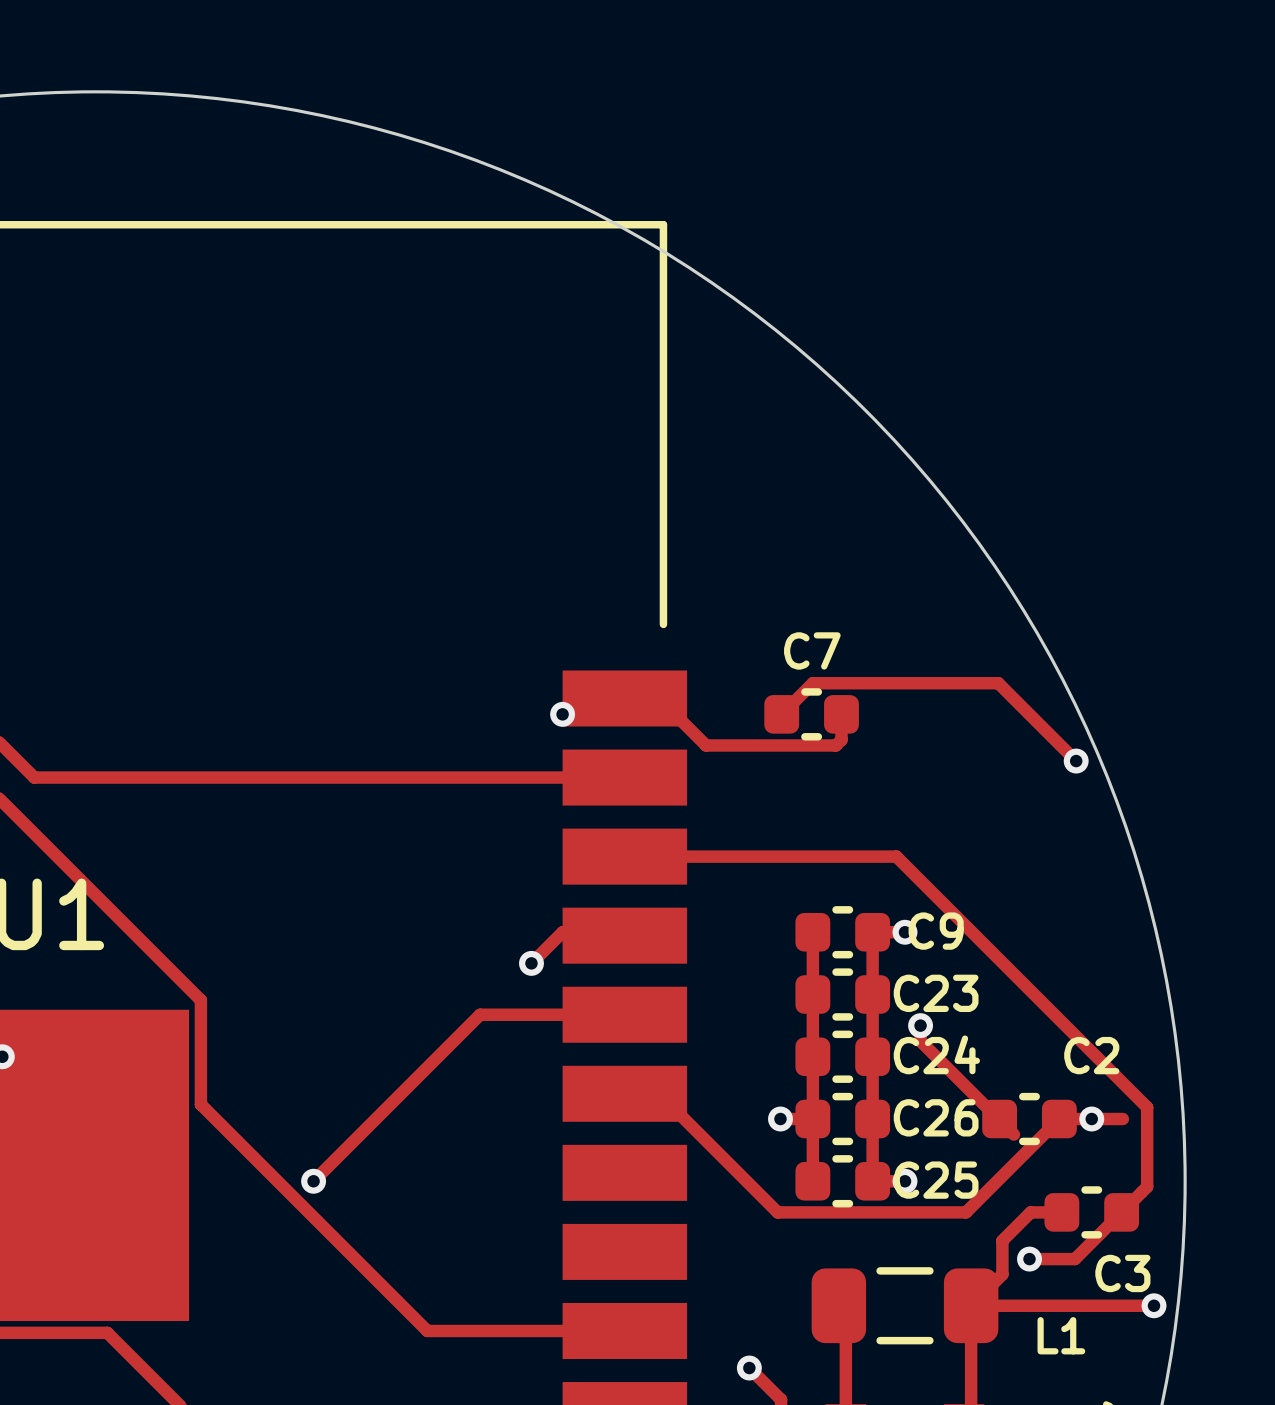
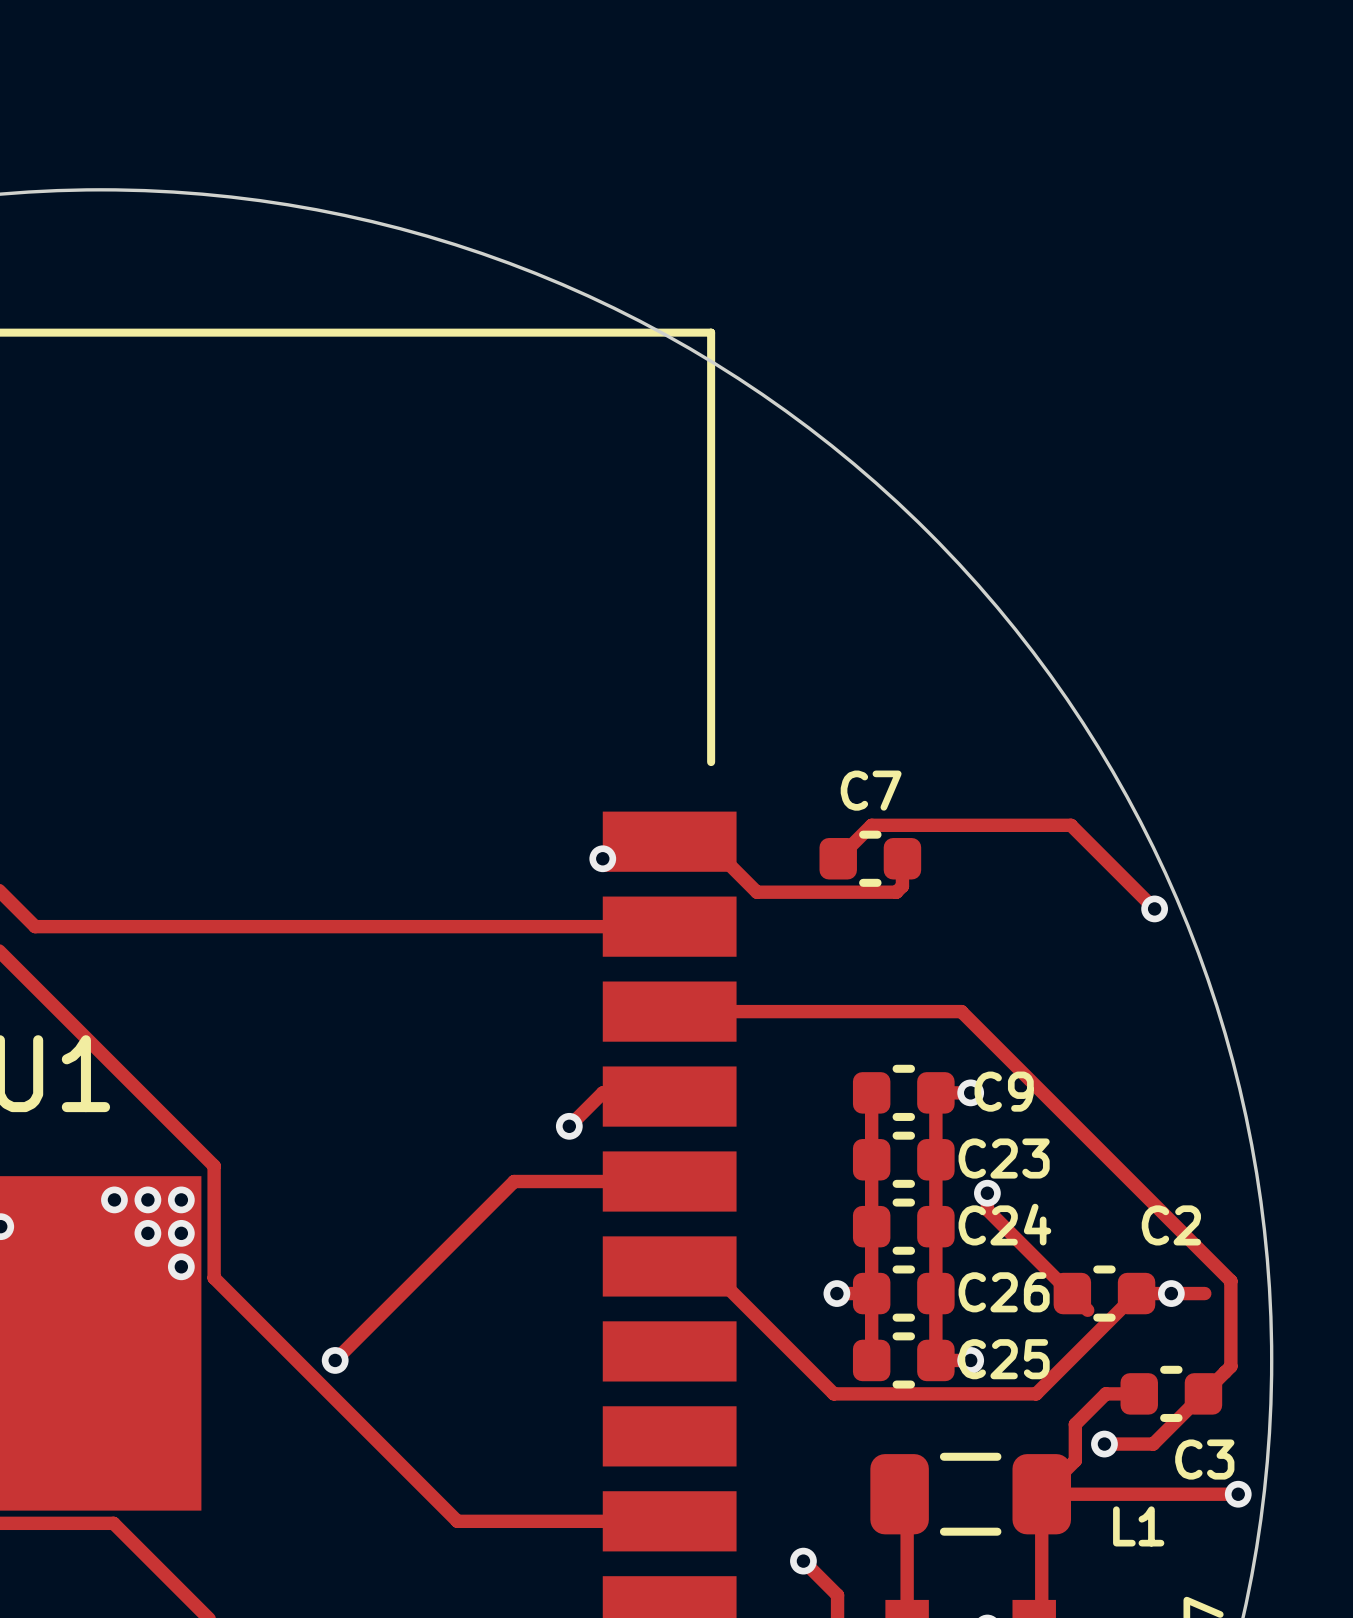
via: none -> (114, 1199)
via: none -> (147, 1199)
via: none -> (181, 1199)
via: none -> (147, 1233)
via: none -> (181, 1233)
via: none -> (181, 1266)

